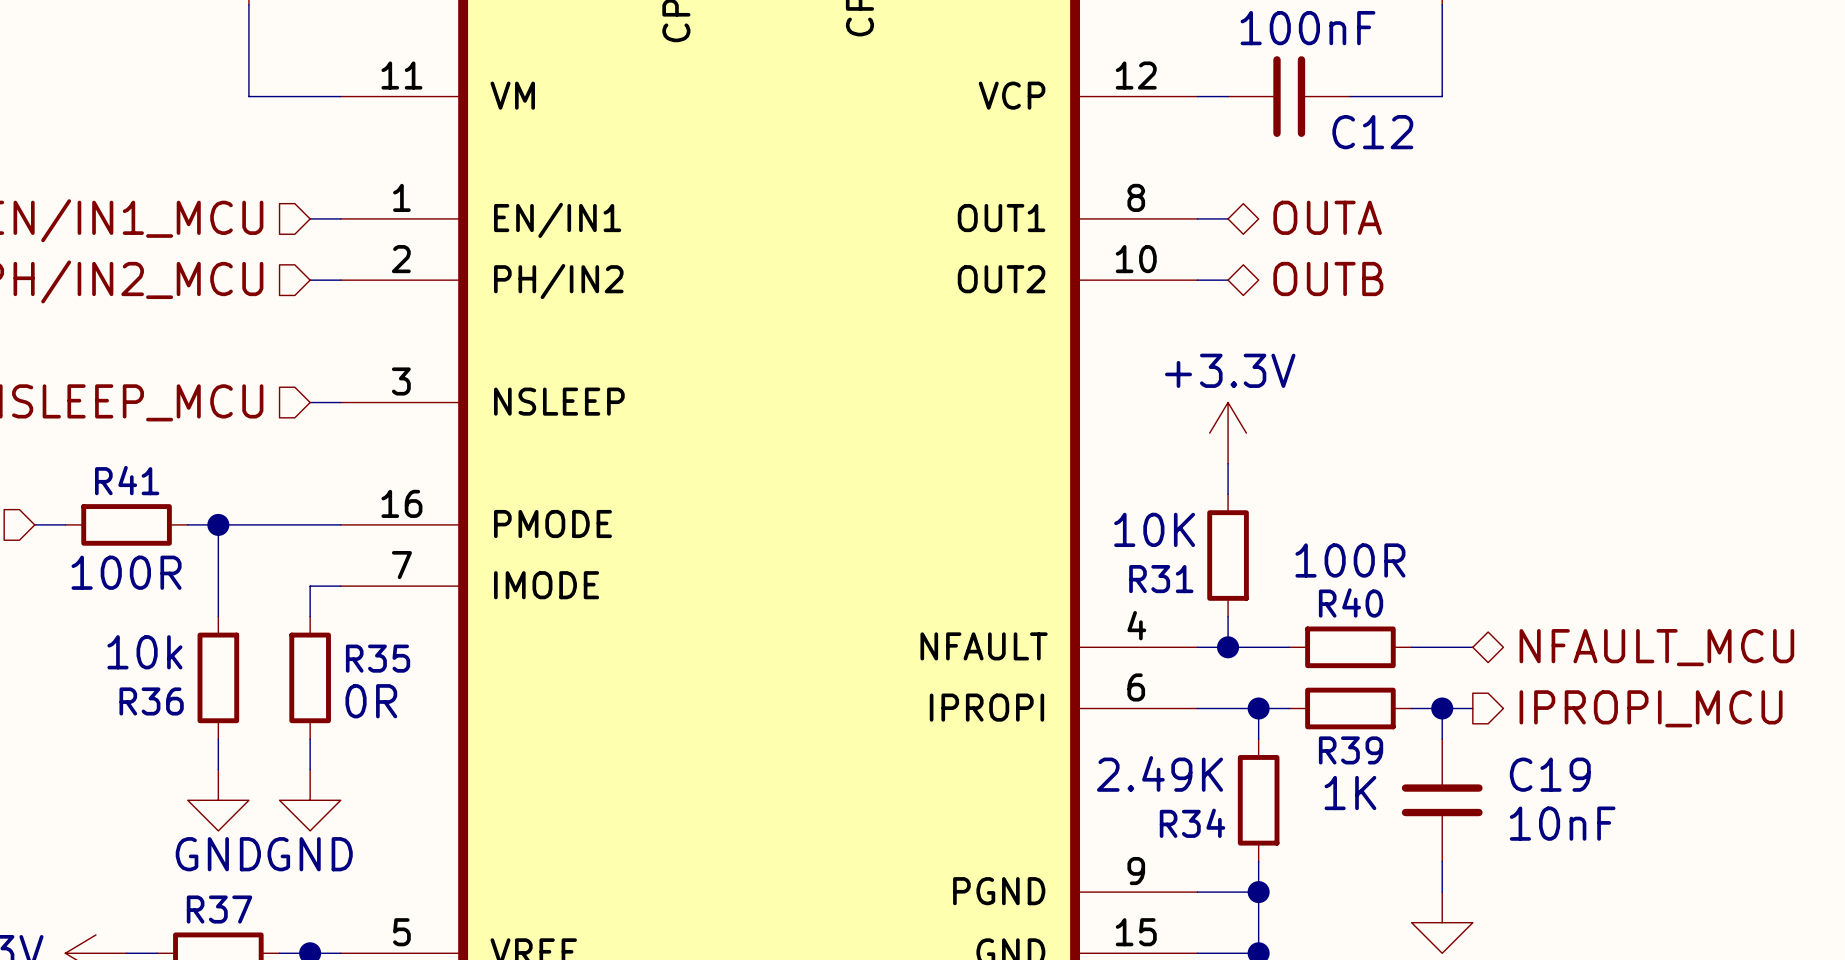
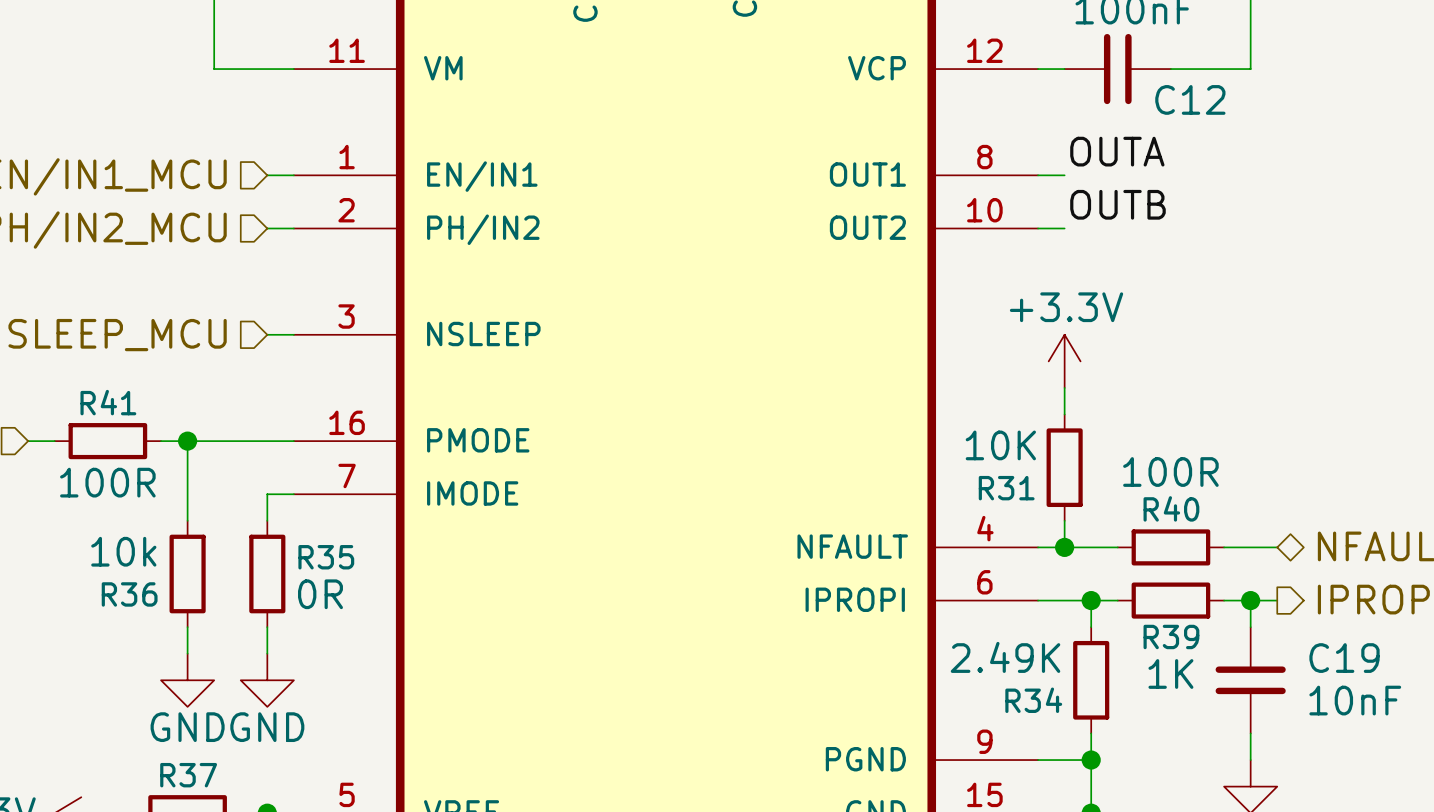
label: none -> OUTA (1117, 151)
hierarchical label: OUTA (1327, 217) -> none
label: none -> OUTB (1117, 204)
hierarchical label: OUTB (1328, 279) -> none

